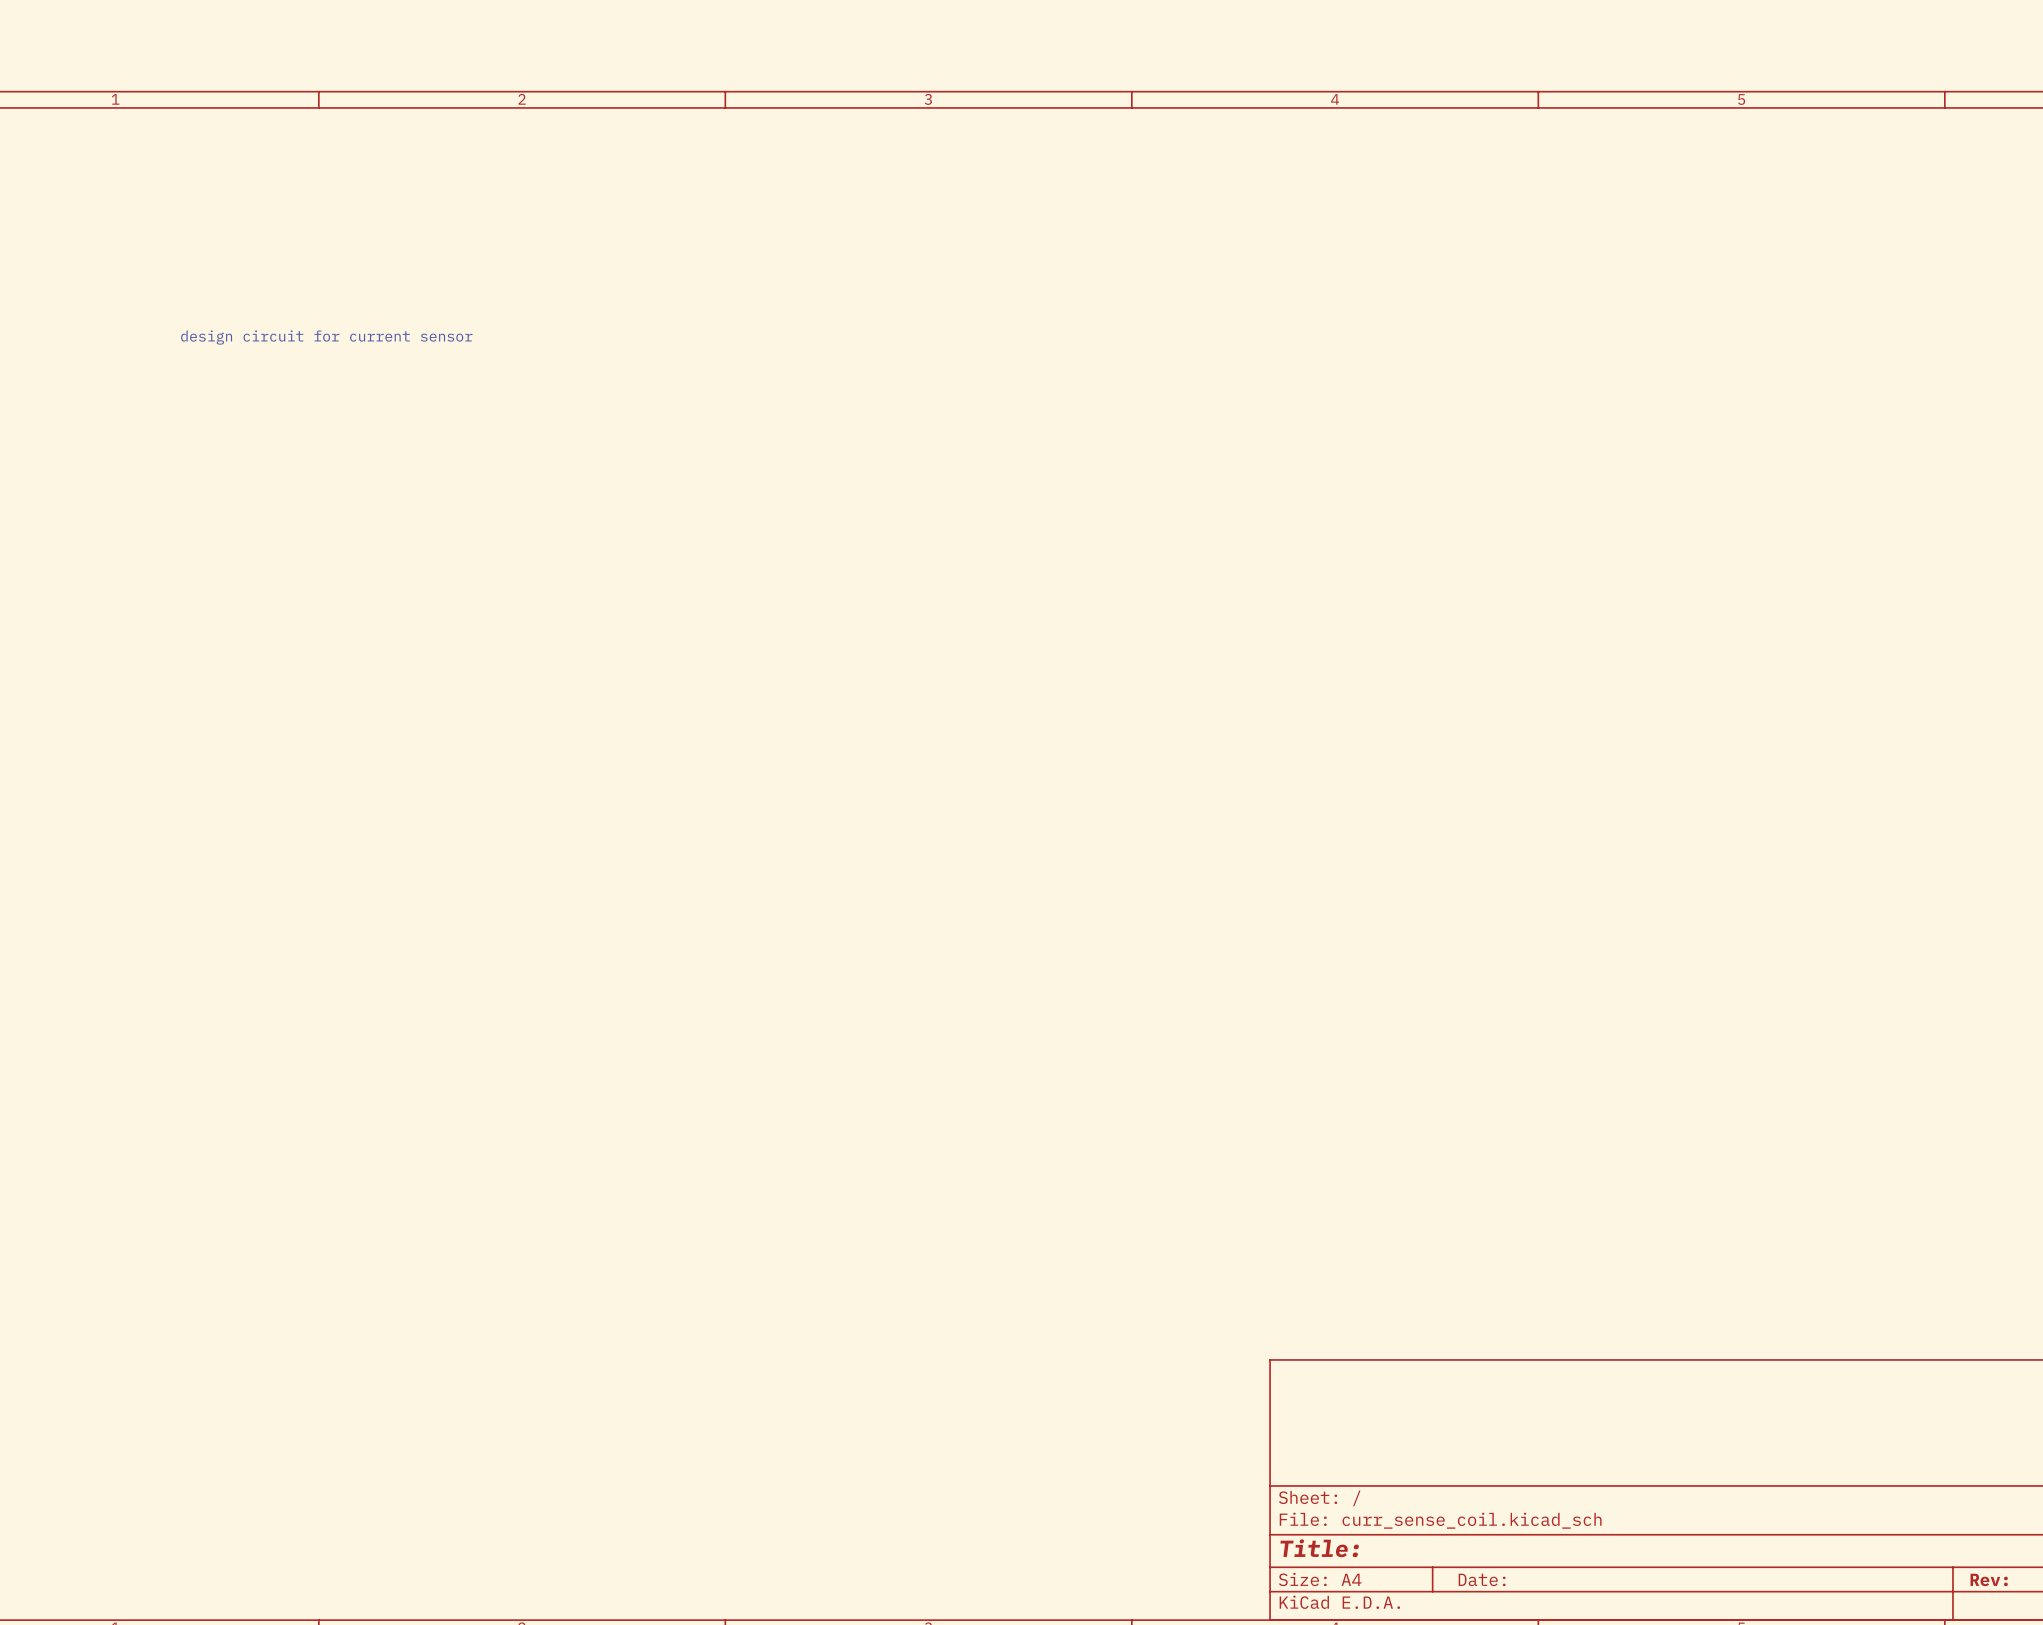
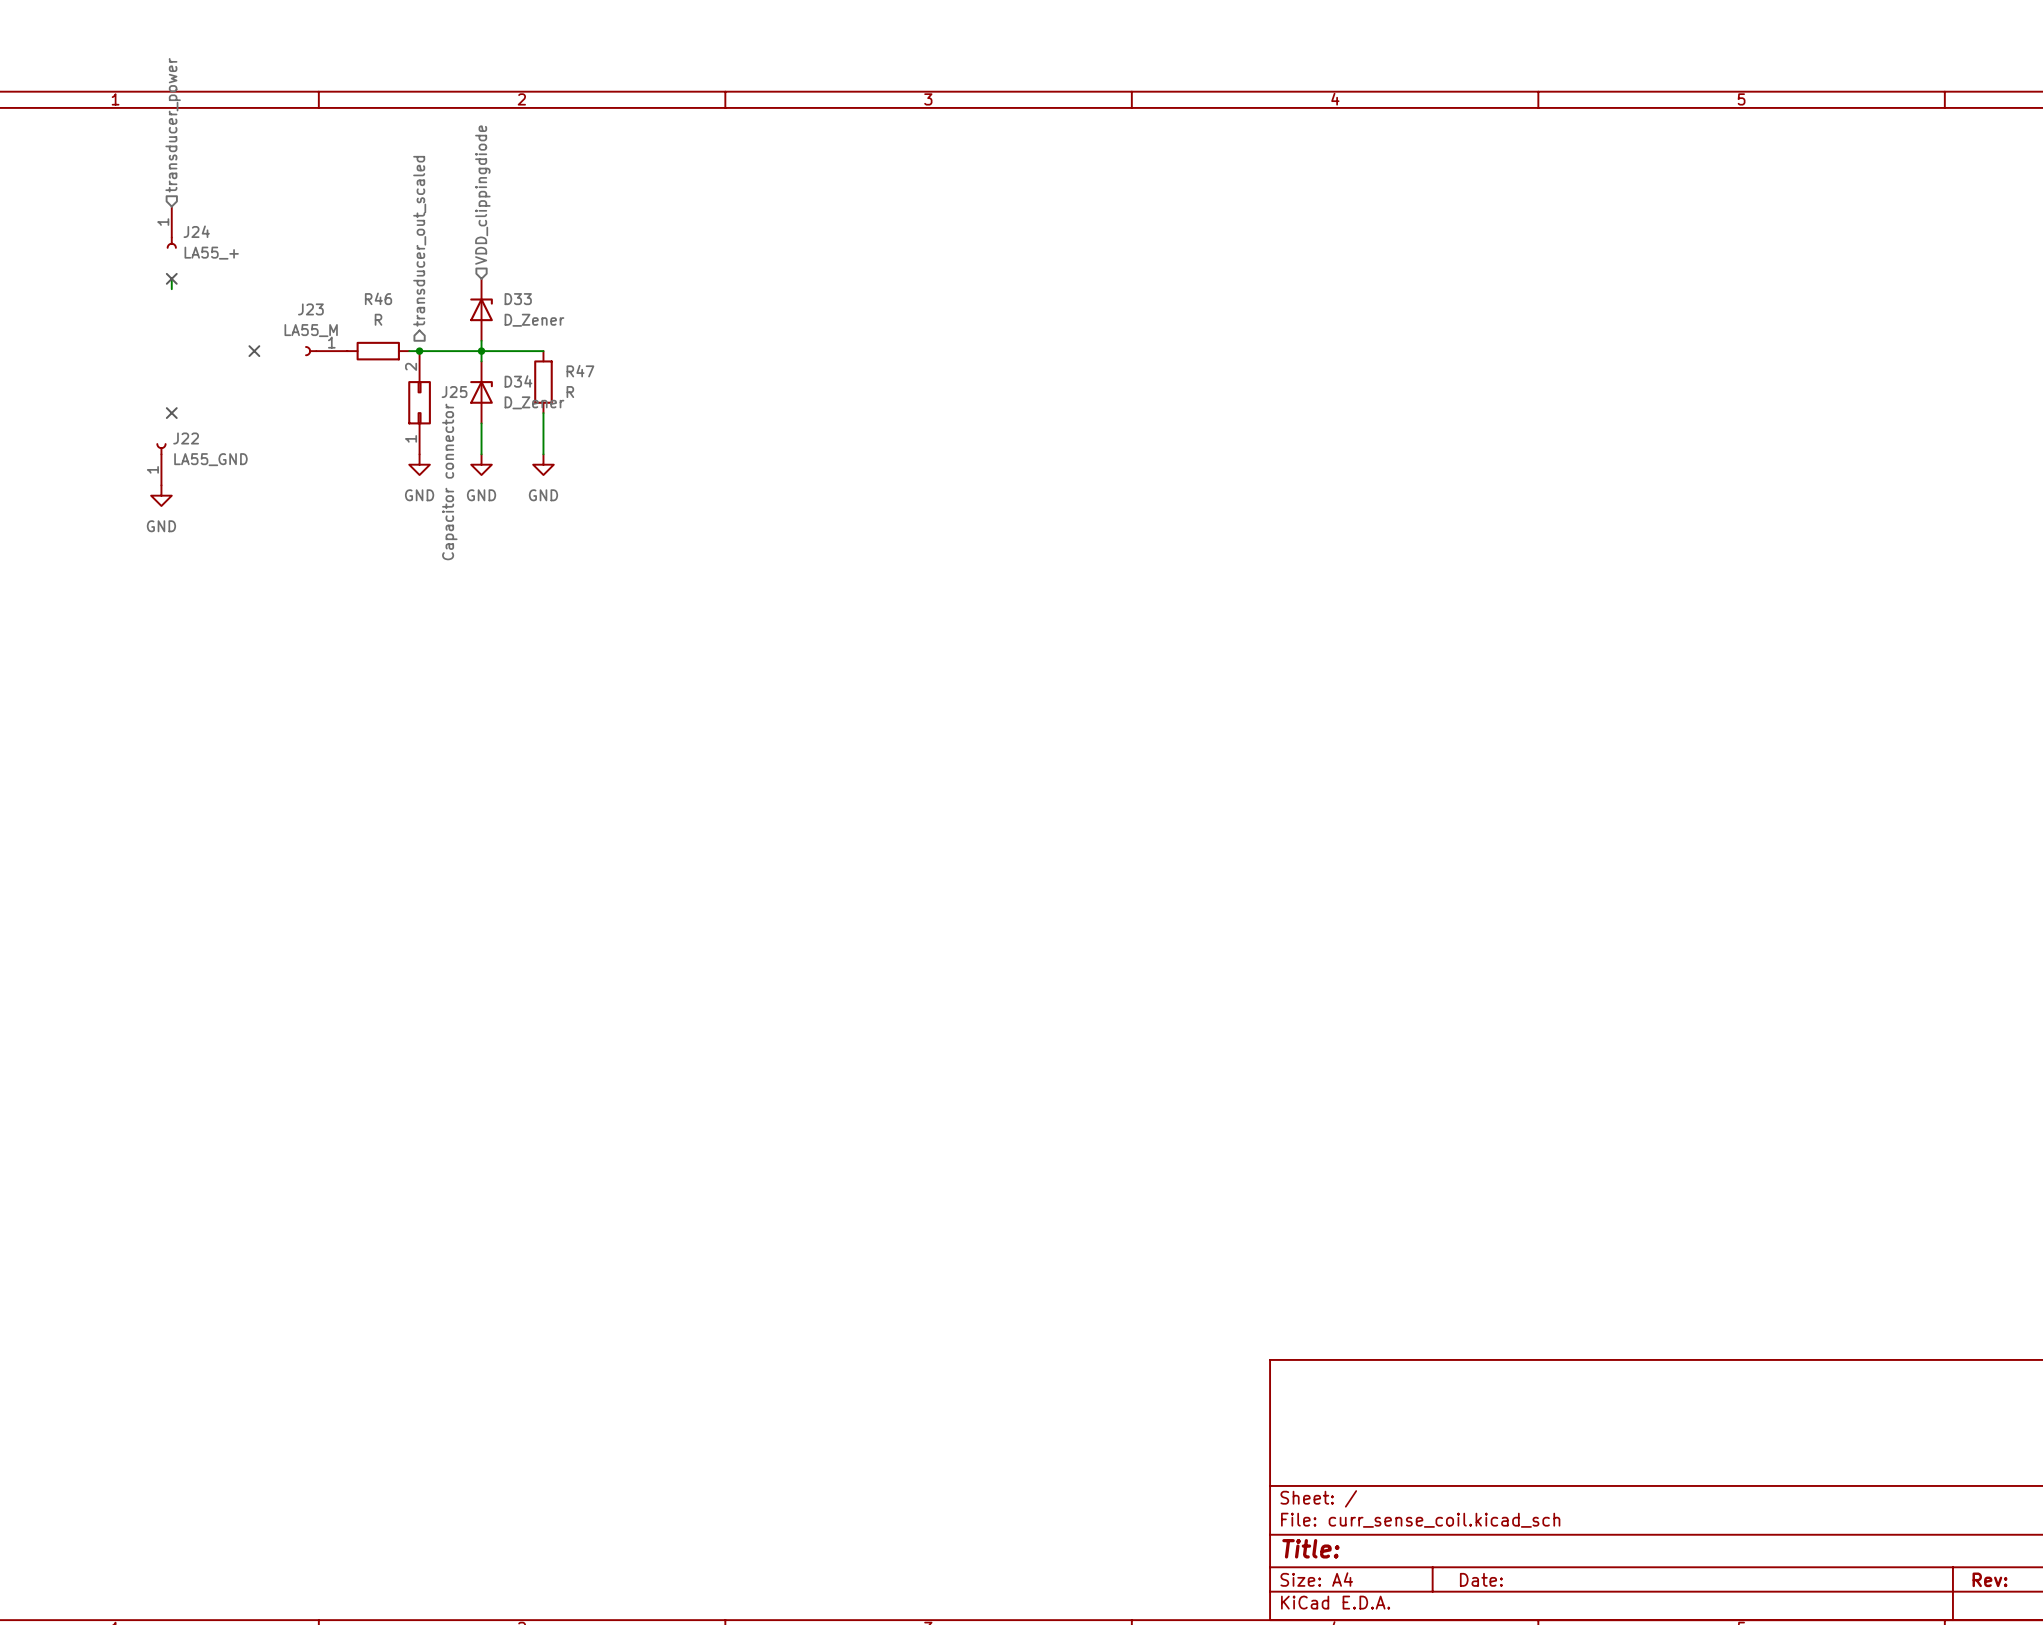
hierarchical label: none -> transducer_power (173, 125)
hierarchical label: none -> VDD_clippingdiode (482, 195)
J24: none -> LA55_+ (171, 227)
hierarchical label: none -> transducer_out_scaled (419, 241)
wire: none -> (171, 278) (171, 289)
no-connect mark: none -> (171, 278)
D33: none -> D_Zener (481, 309)
text: design circuit for current sensor (326, 337) -> none
wire: none -> (481, 340) (481, 361)
no-connect mark: none -> (254, 351)
J23: none -> LA55_M (326, 351)
R46: none -> R (378, 351)
wire: none -> (409, 351) (543, 351)
junction: none -> (419, 351)
junction: none -> (481, 351)
R47: none -> R (543, 382)
D34: none -> D_Zener (481, 392)
J25: none -> Capacitor connector (419, 402)
no-connect mark: none -> (171, 413)
wire: none -> (543, 413) (543, 454)
wire: none -> (481, 423) (481, 454)
J22: none -> LA55_GND (161, 464)
power symbol: none -> GND (419, 464)
power symbol: none -> GND (481, 464)
power symbol: none -> GND (543, 464)
power symbol: none -> GND (161, 495)

